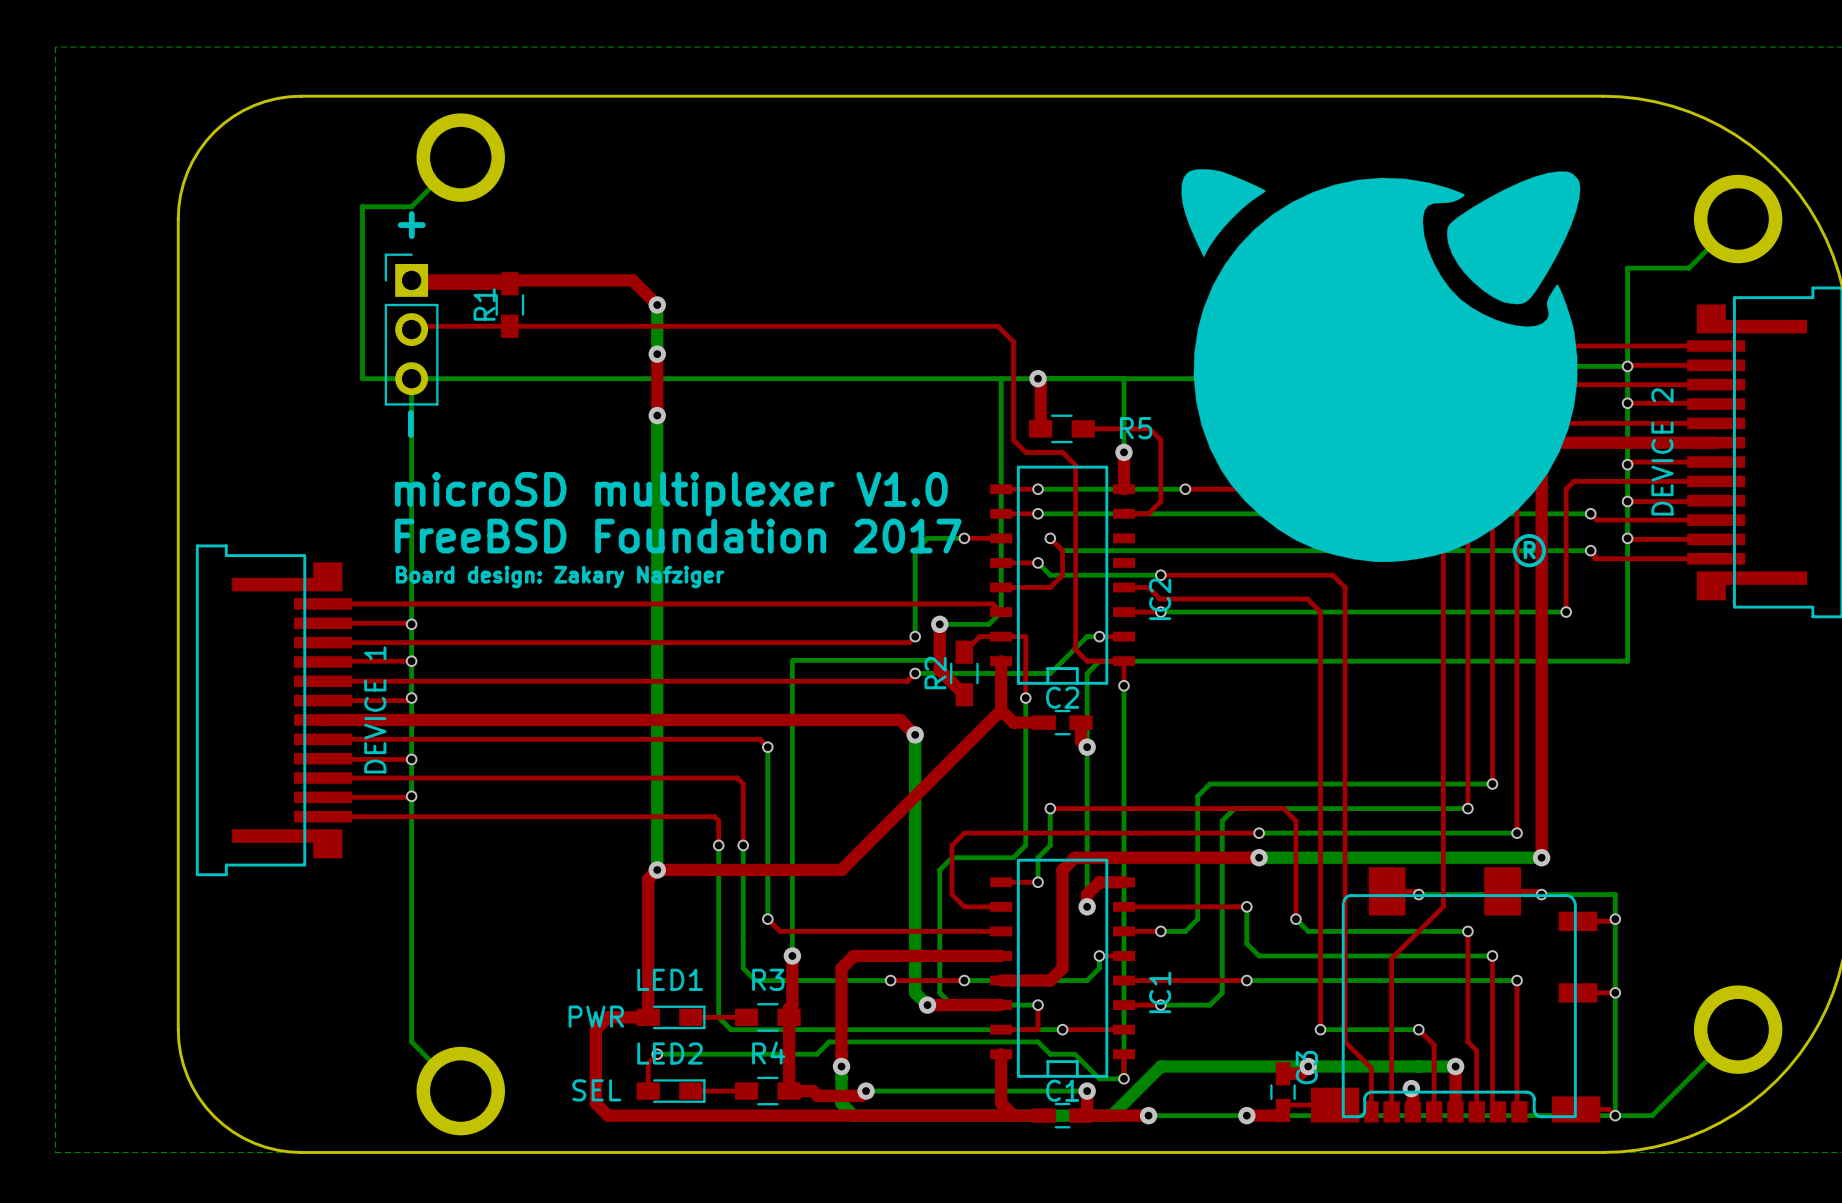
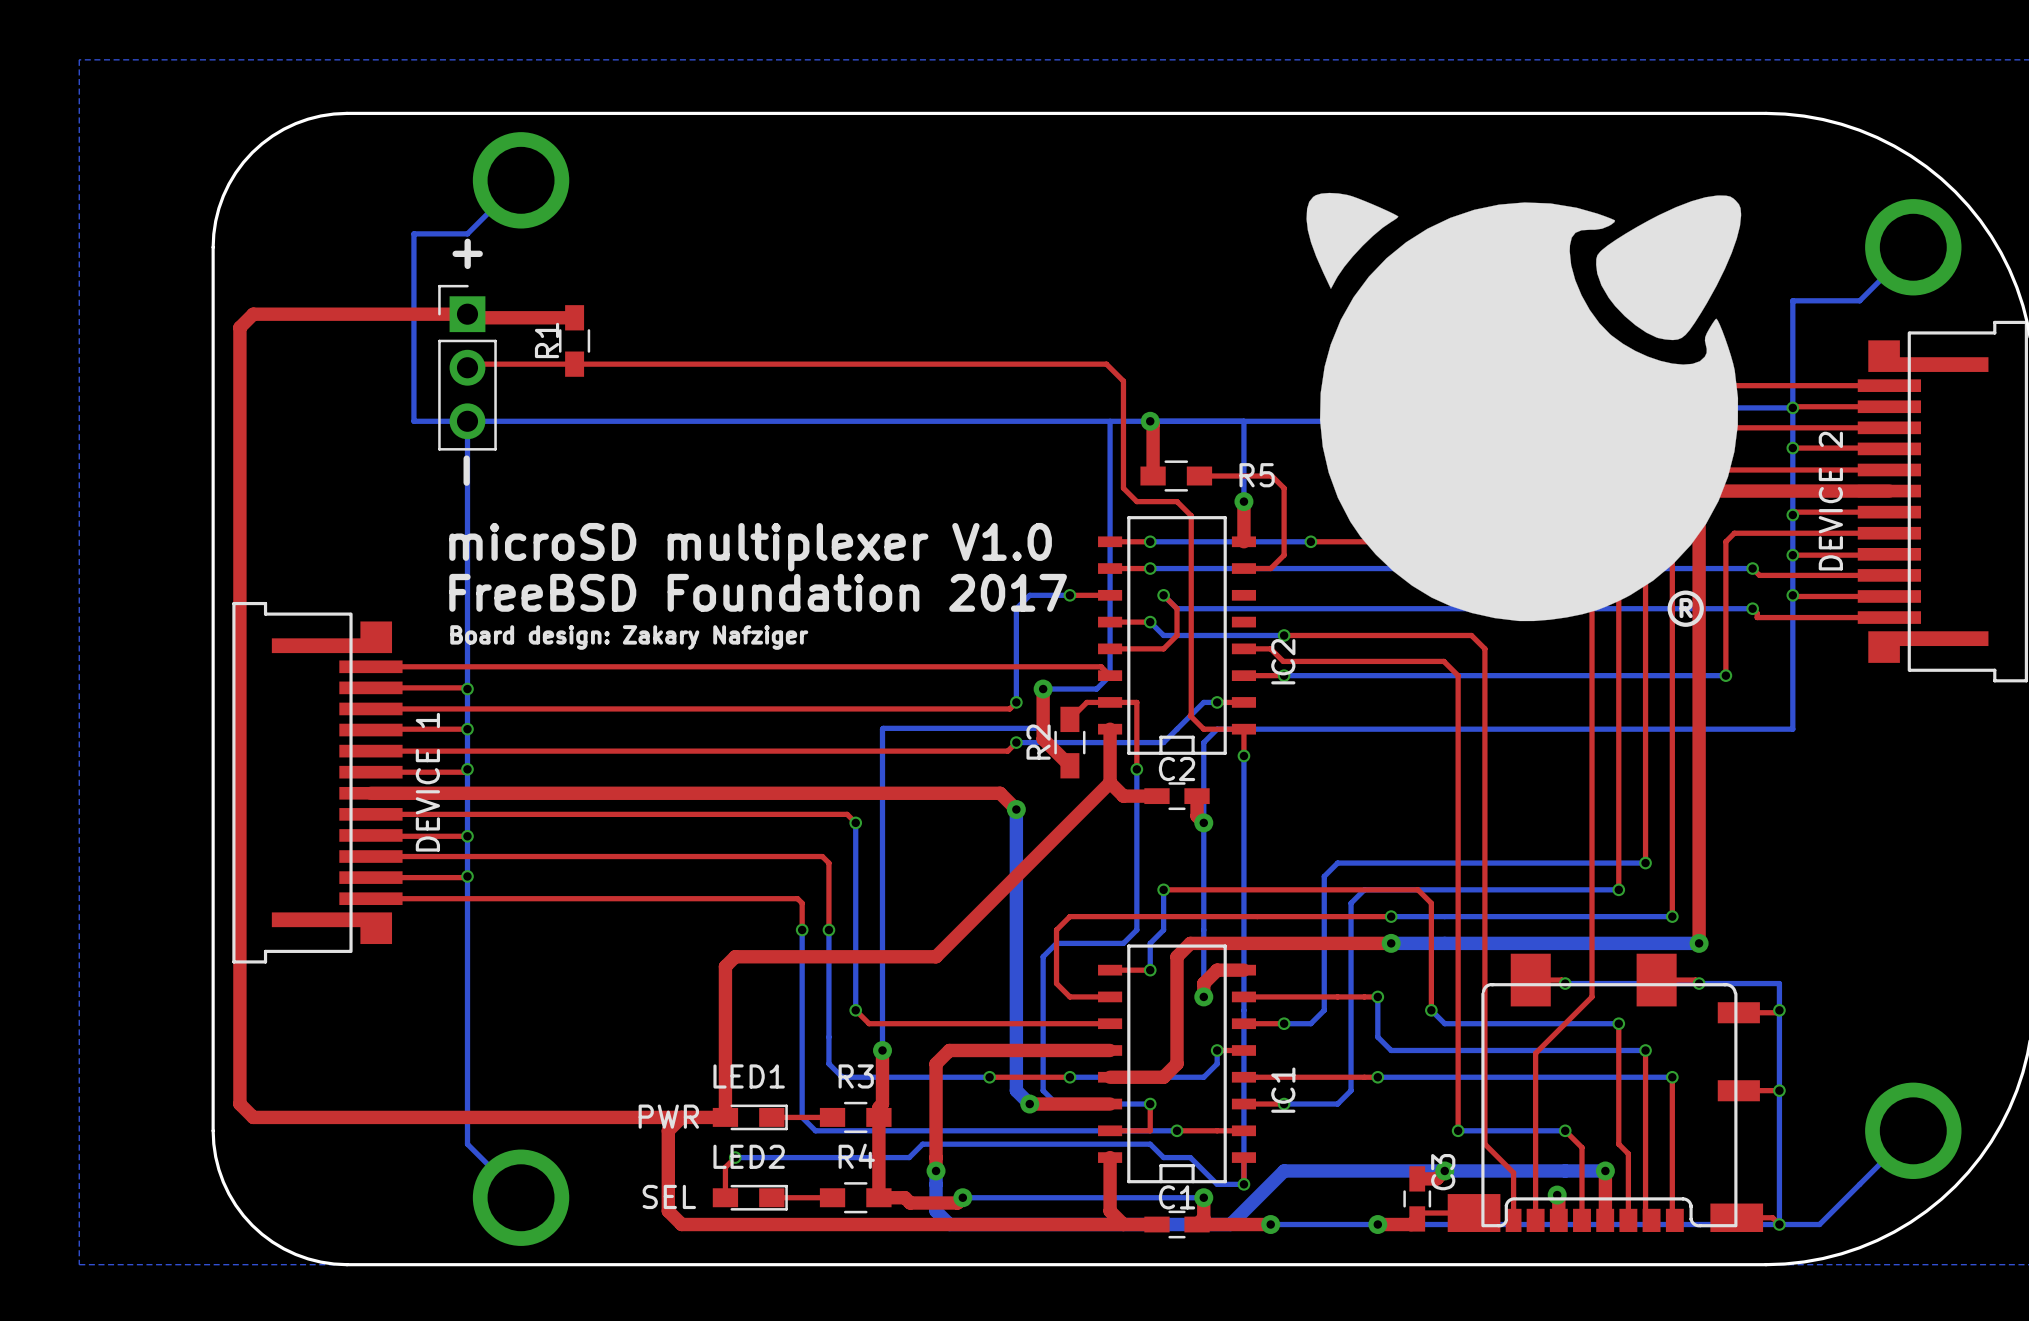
top track: (411, 280) (632, 280) (657, 305) -> (467, 314) (253, 314) (239, 327) (239, 1104) (253, 1117) (681, 1117)
bottom track: (657, 305) (657, 354) -> none
via: (657, 305) -> none
top track: (657, 354) (657, 415) -> none
via: (657, 354) -> none
bottom track: (657, 415) (657, 869) -> none
via: (657, 415) -> none
via: (657, 869) -> none

